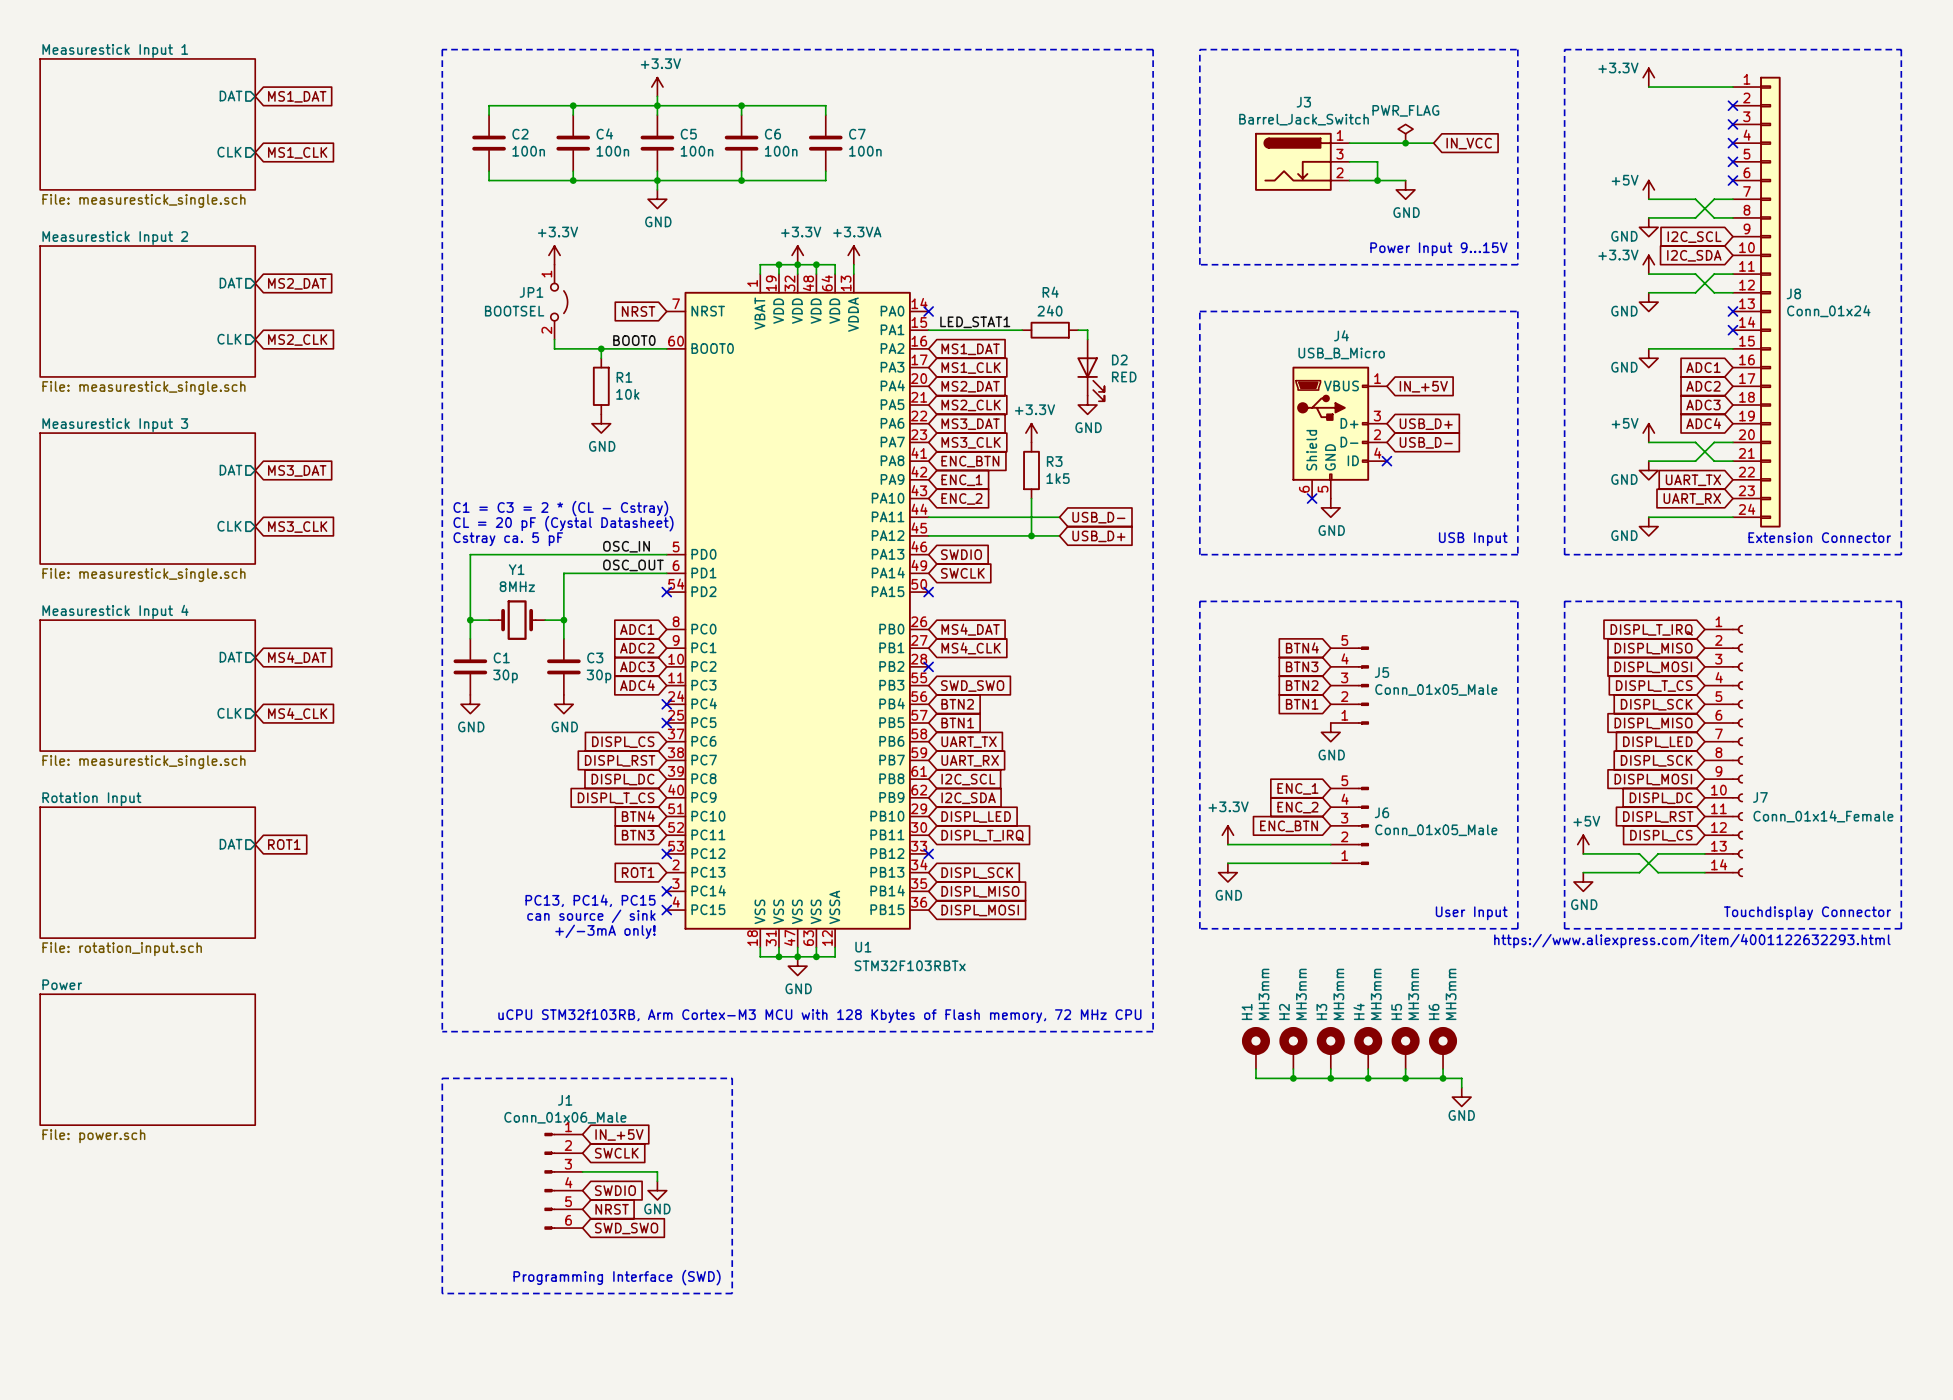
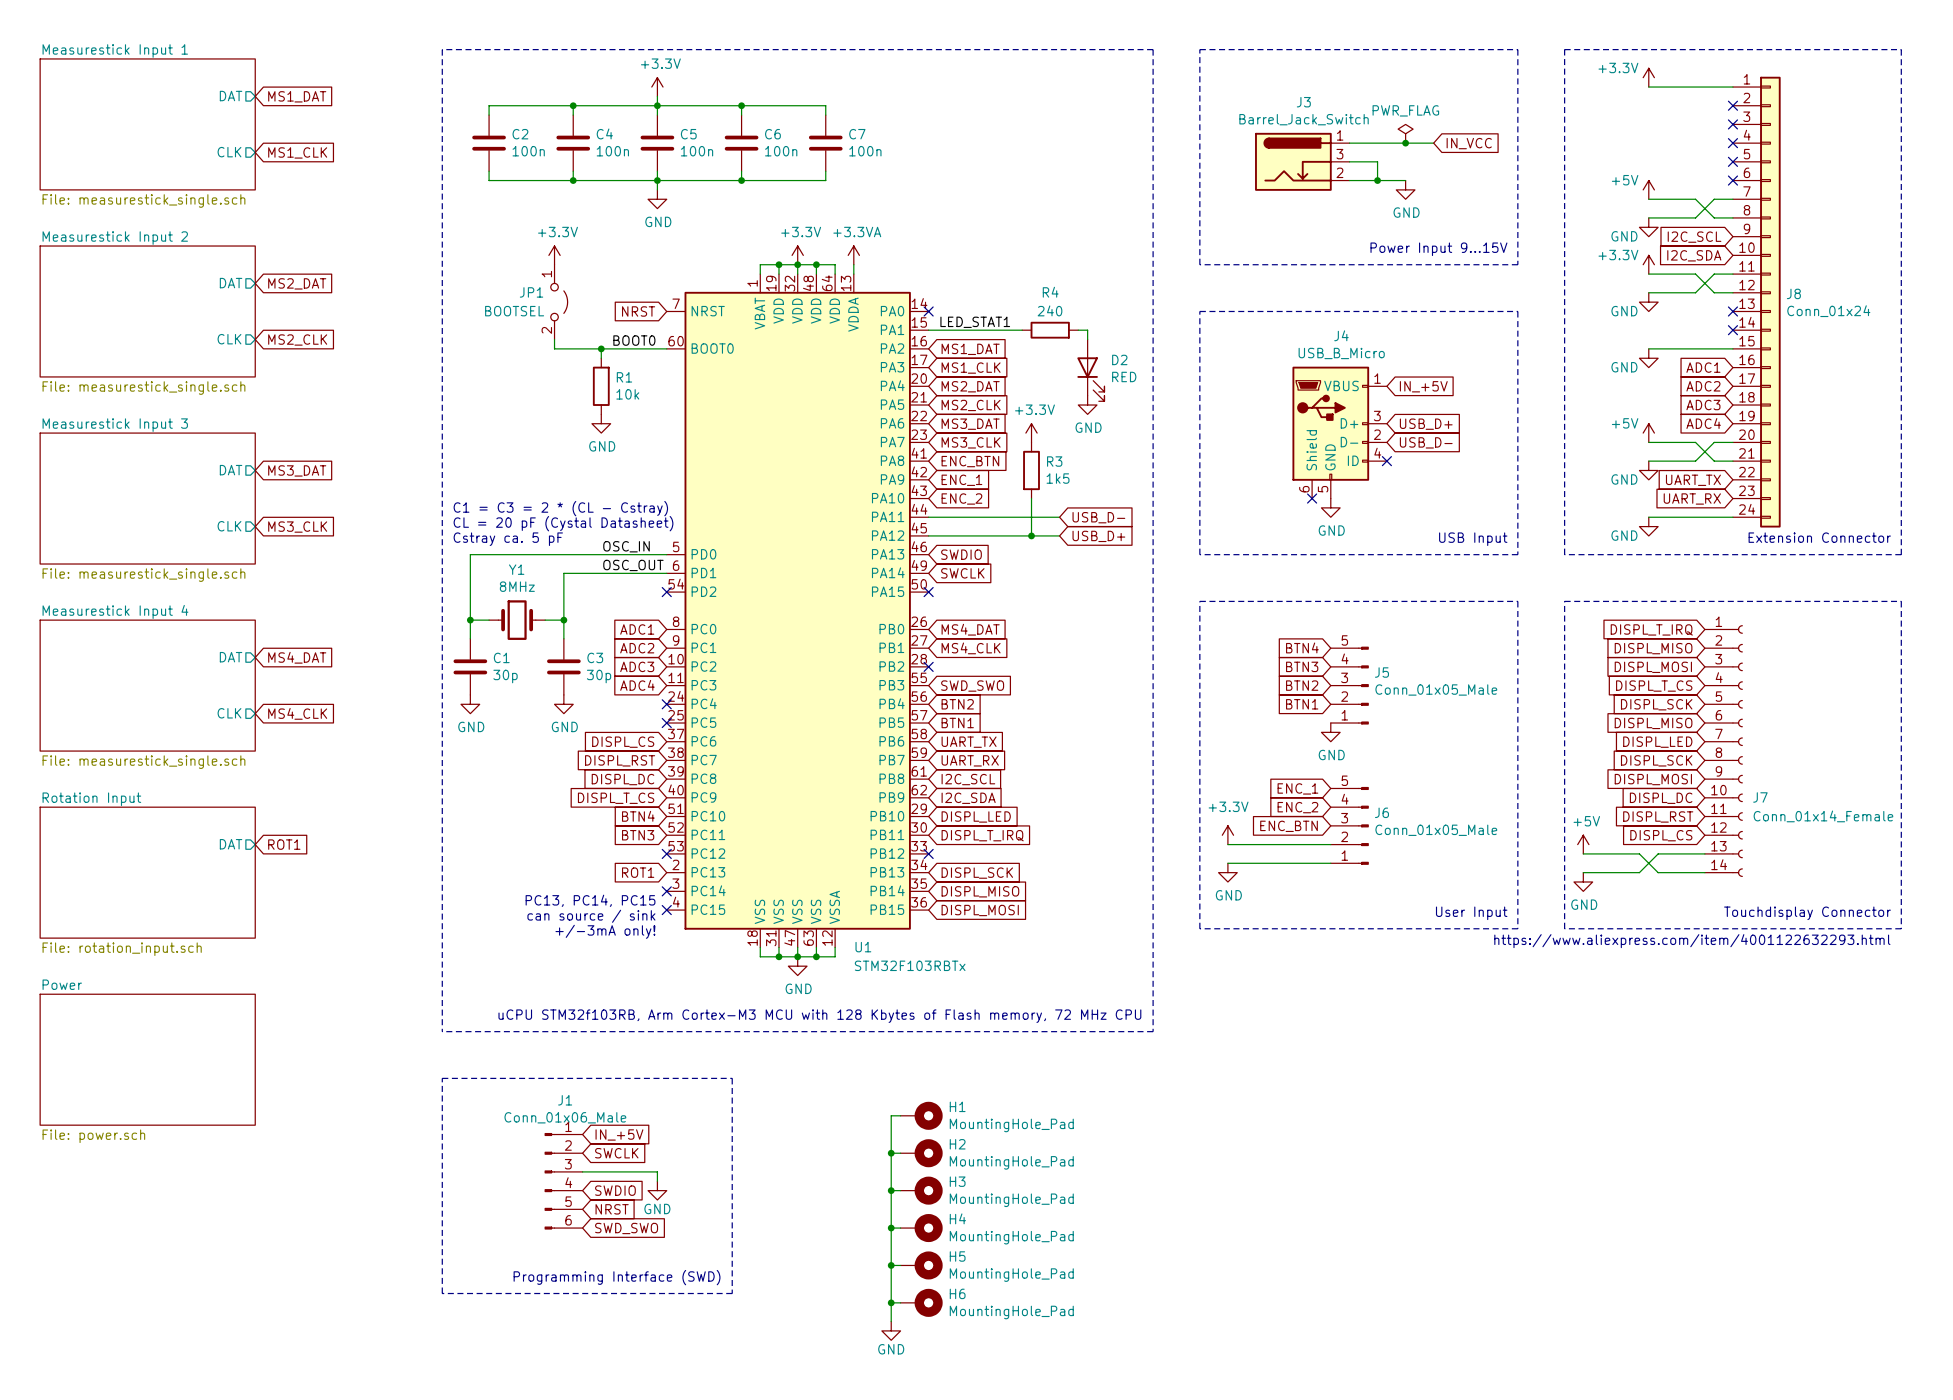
H1 value: MH3mm (1264, 994) -> MountingHole_Pad (1011, 1125)
H2 value: MH3mm (1301, 994) -> MountingHole_Pad (1011, 1162)
H3 value: MH3mm (1338, 994) -> MountingHole_Pad (1011, 1200)
H4 value: MH3mm (1376, 994) -> MountingHole_Pad (1011, 1237)
H5 value: MH3mm (1413, 994) -> MountingHole_Pad (1011, 1275)
H6 value: MH3mm (1451, 994) -> MountingHole_Pad (1011, 1312)
H1 rotation: 0° (1255, 1040) -> 90° clockwise (928, 1115)
H2 rotation: 0° (1293, 1040) -> 90° clockwise (928, 1153)
H3 rotation: 0° (1330, 1040) -> 90° clockwise (928, 1190)
H4 rotation: 0° (1368, 1040) -> 90° clockwise (928, 1228)
H5 rotation: 0° (1405, 1040) -> 90° clockwise (928, 1265)
H6 rotation: 0° (1443, 1040) -> 90° clockwise (928, 1302)
H1 position: (1255, 1048) -> (921, 1115)
H2 position: (1293, 1048) -> (921, 1153)
H3 position: (1330, 1048) -> (921, 1190)
H4 position: (1368, 1048) -> (921, 1228)
H5 position: (1405, 1048) -> (921, 1265)
H6 position: (1443, 1048) -> (921, 1302)
wire: (1255, 1069) (1255, 1078) (1461, 1078) (1461, 1087) -> none
wire: (1293, 1069) (1293, 1078) -> none
wire: (1330, 1069) (1330, 1078) -> none
wire: (1368, 1069) (1368, 1078) -> none
wire: (1405, 1069) (1405, 1078) -> none
wire: (1443, 1069) (1443, 1078) -> none
junction: (1293, 1078) -> none
junction: (1330, 1078) -> none
junction: (1368, 1078) -> none
junction: (1405, 1078) -> none
junction: (1443, 1078) -> none
power symbol: GND (1461, 1097) -> none
wire: none -> (900, 1115) (891, 1115) (891, 1321)
wire: none -> (891, 1153) (900, 1153)
junction: none -> (891, 1153)
wire: none -> (891, 1190) (900, 1190)
junction: none -> (891, 1190)
wire: none -> (891, 1228) (900, 1228)
junction: none -> (891, 1228)
wire: none -> (891, 1265) (900, 1265)
junction: none -> (891, 1265)
wire: none -> (891, 1302) (900, 1302)
junction: none -> (891, 1302)
power symbol: none -> GND (891, 1330)

